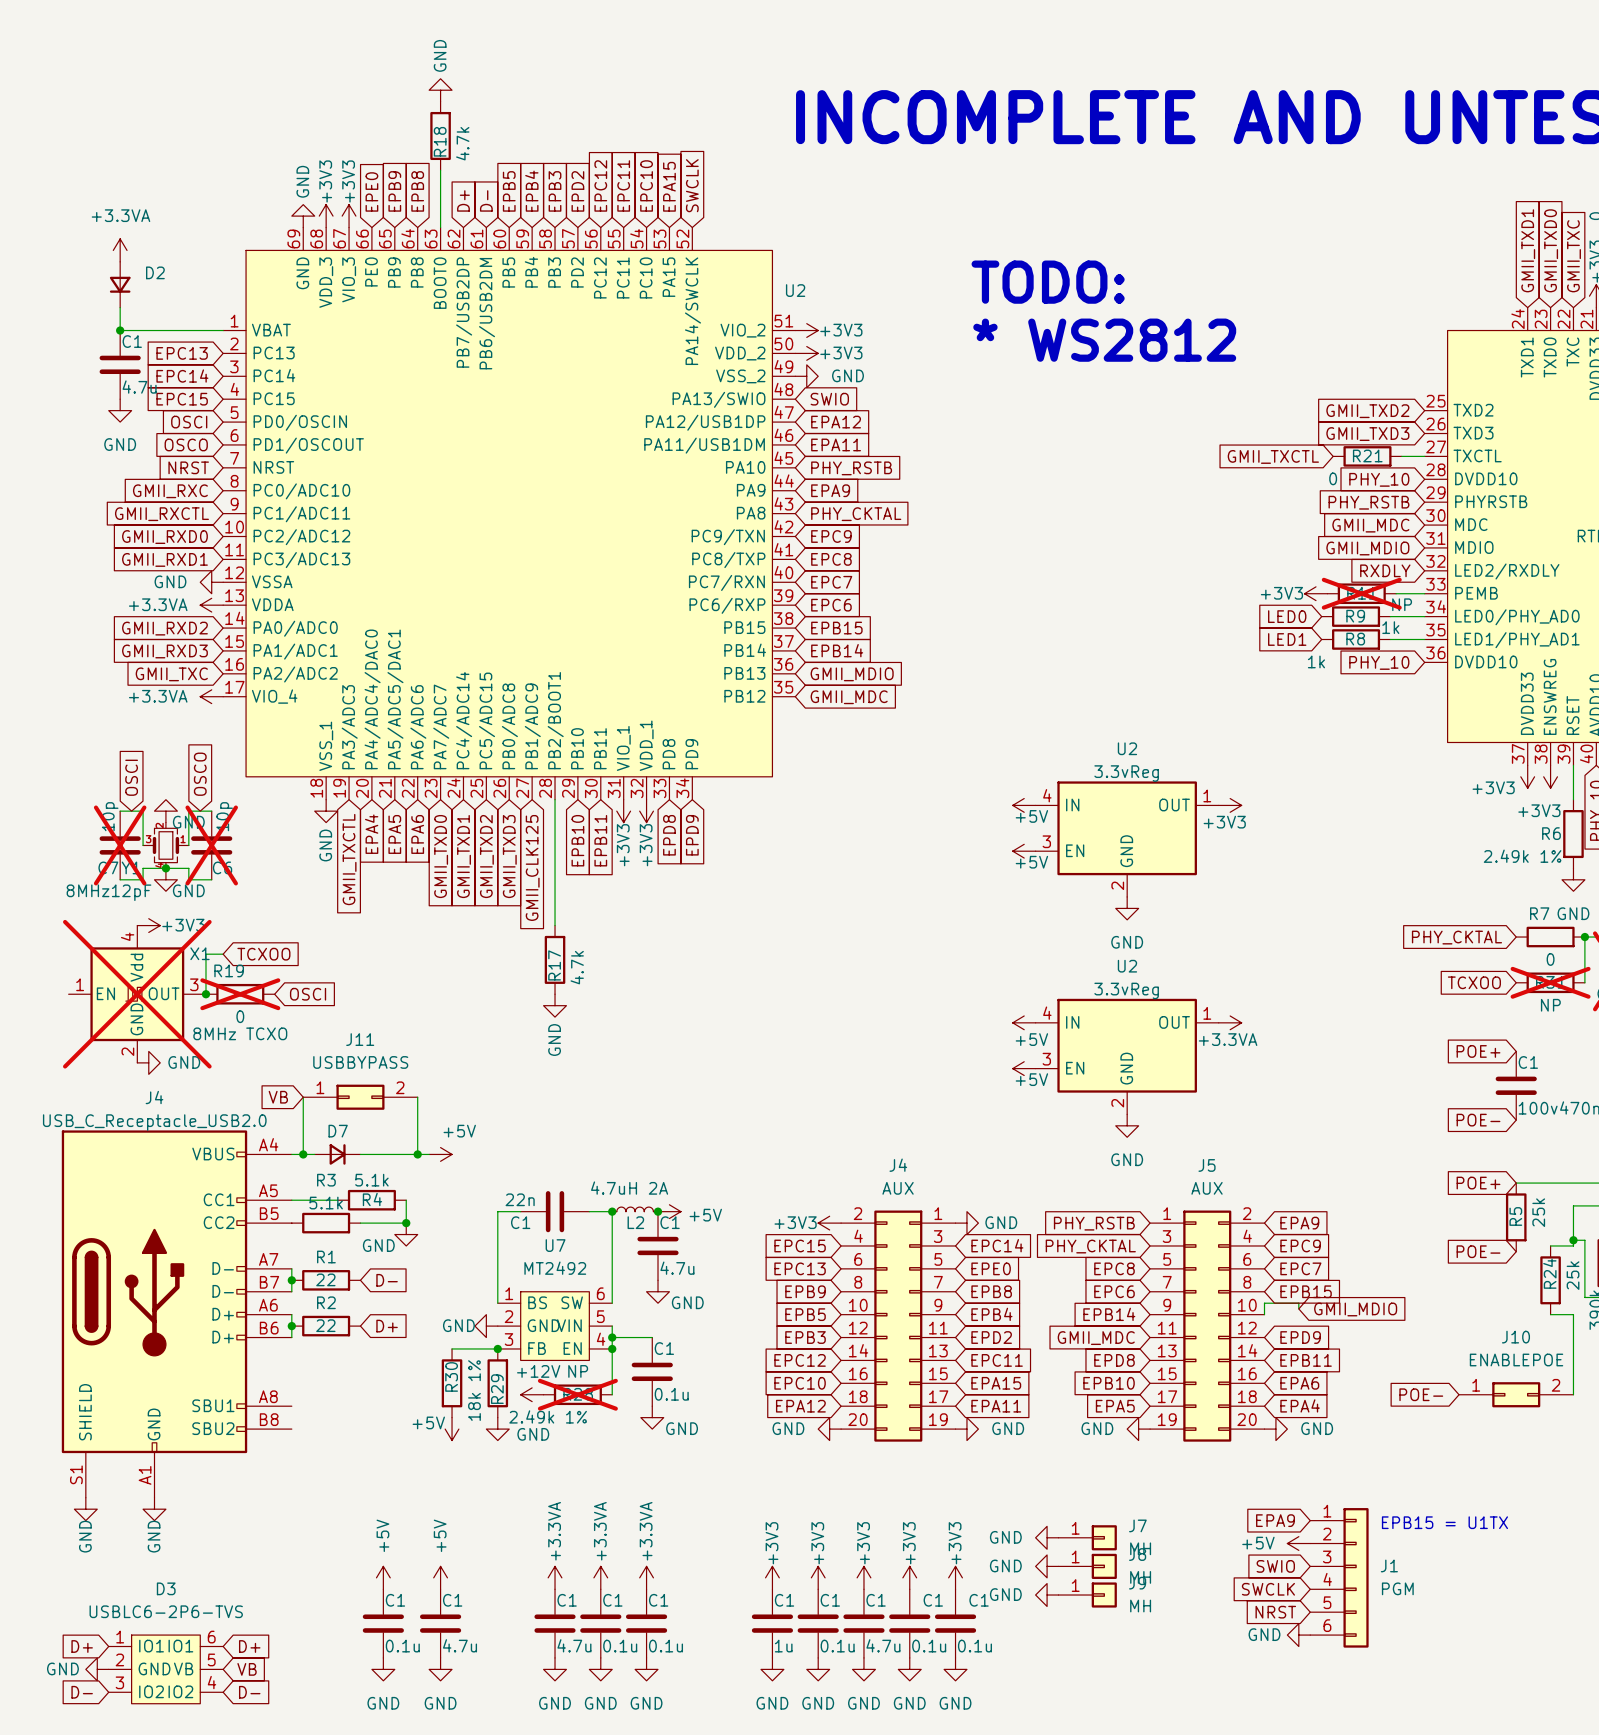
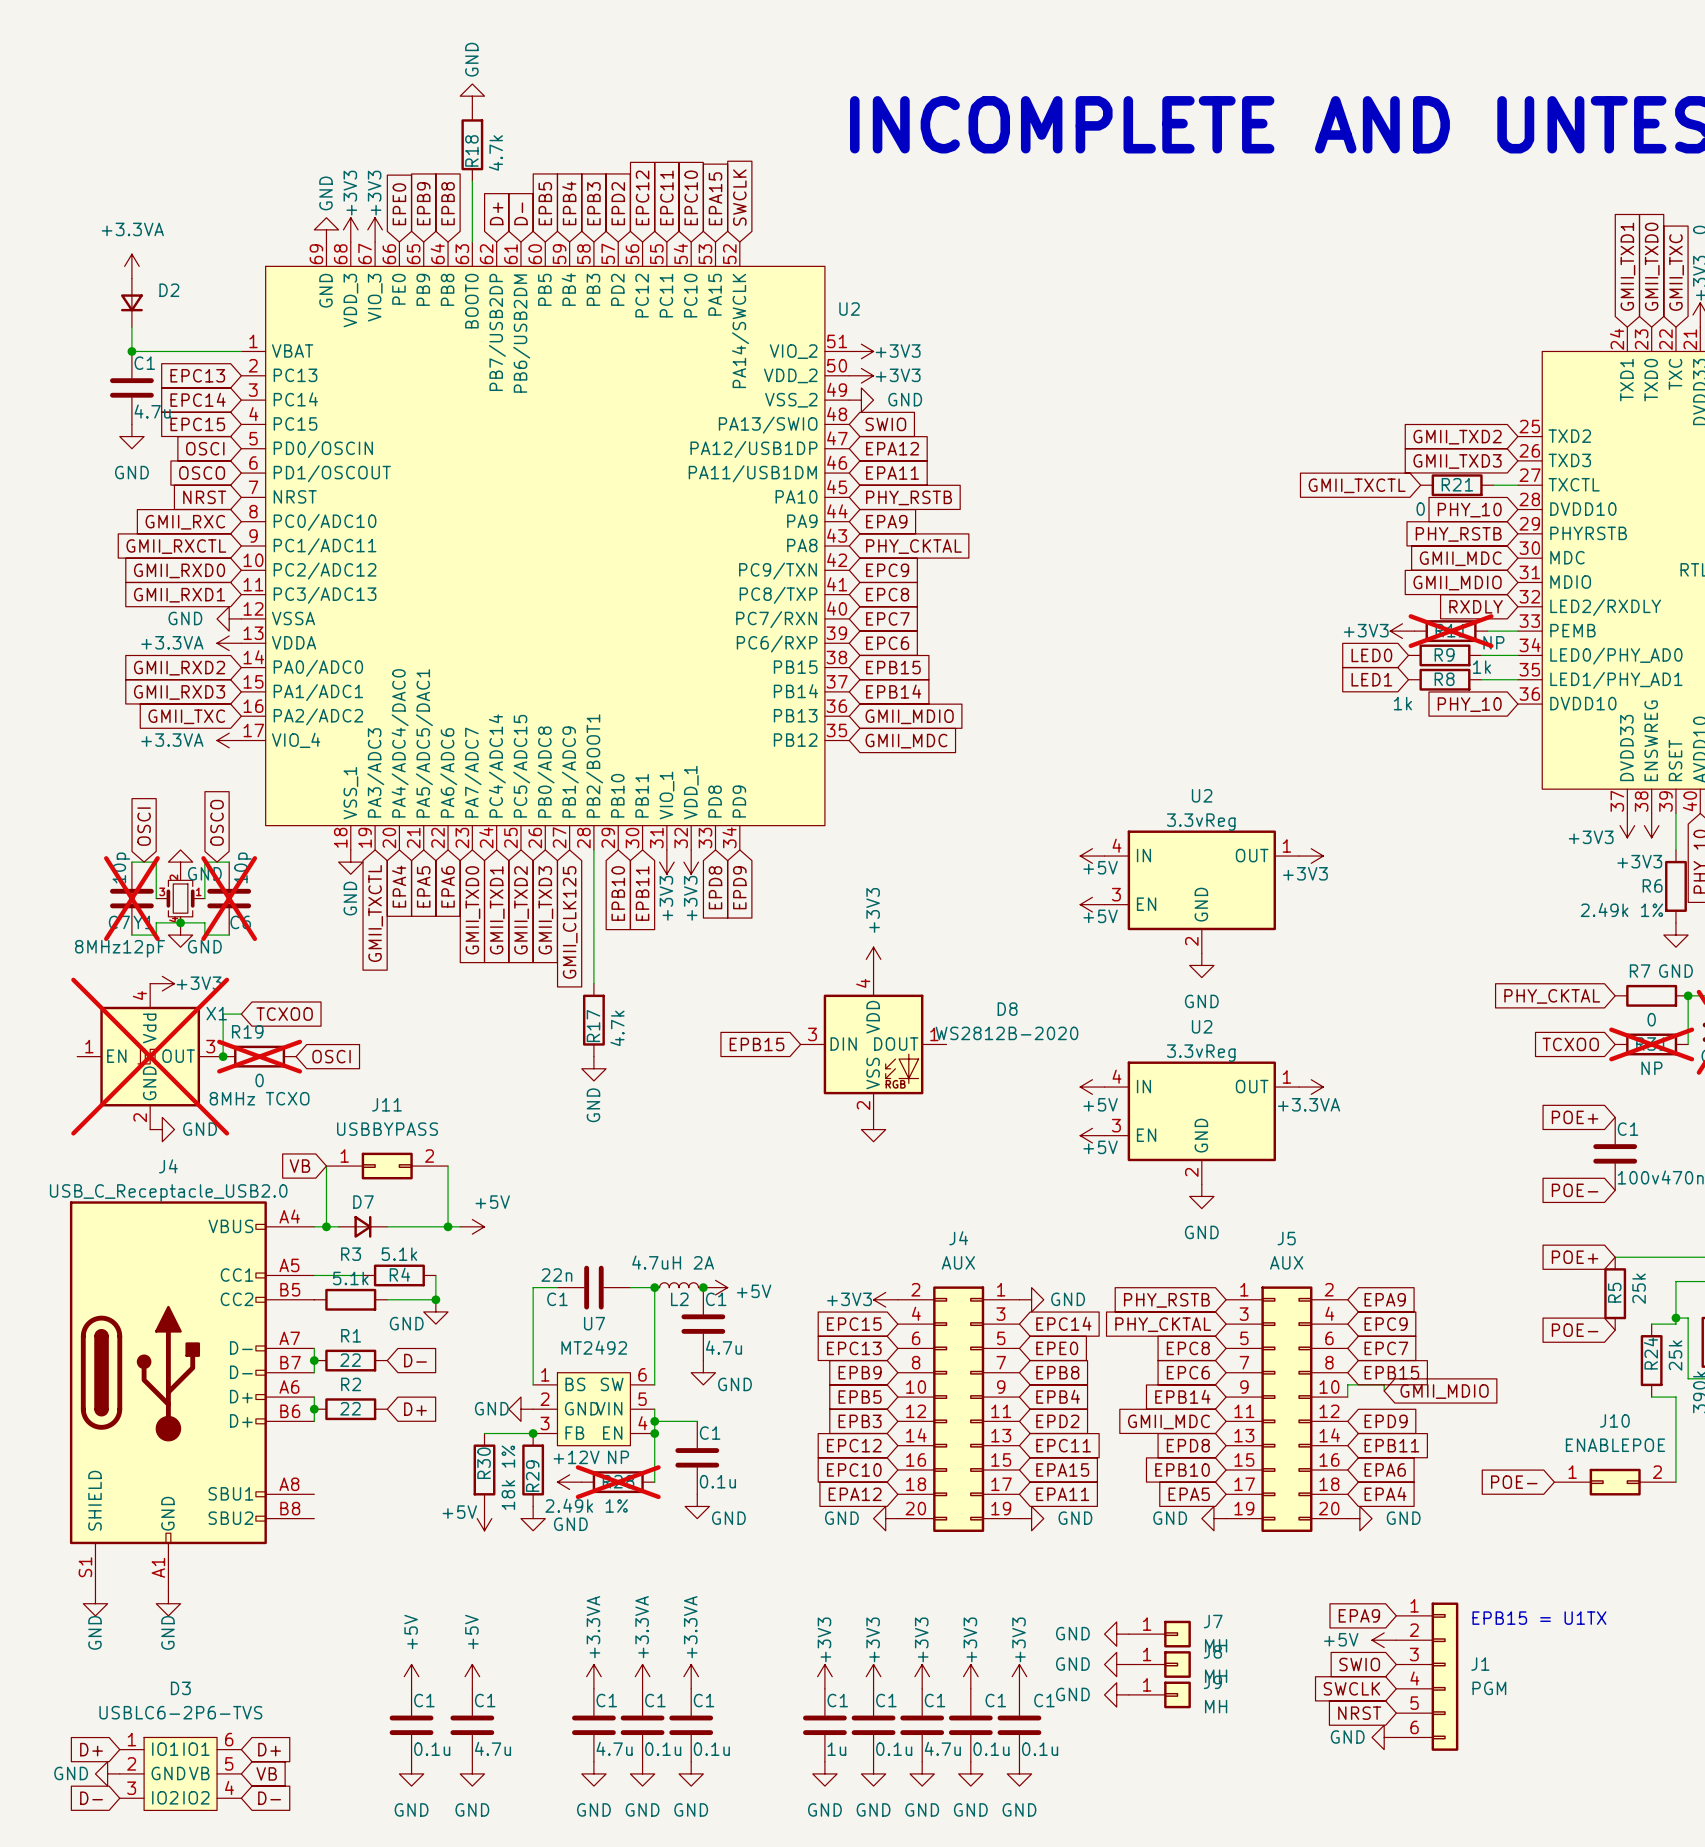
text: TODO: (1048, 282) -> none
text: * WS2812 (1104, 340) -> none
power symbol: none -> +3V3 (873, 959)
global label: none -> EPB15 (757, 1044)
D8: none -> WS2812B-2020 (873, 1044)
power symbol: none -> (873, 1129)

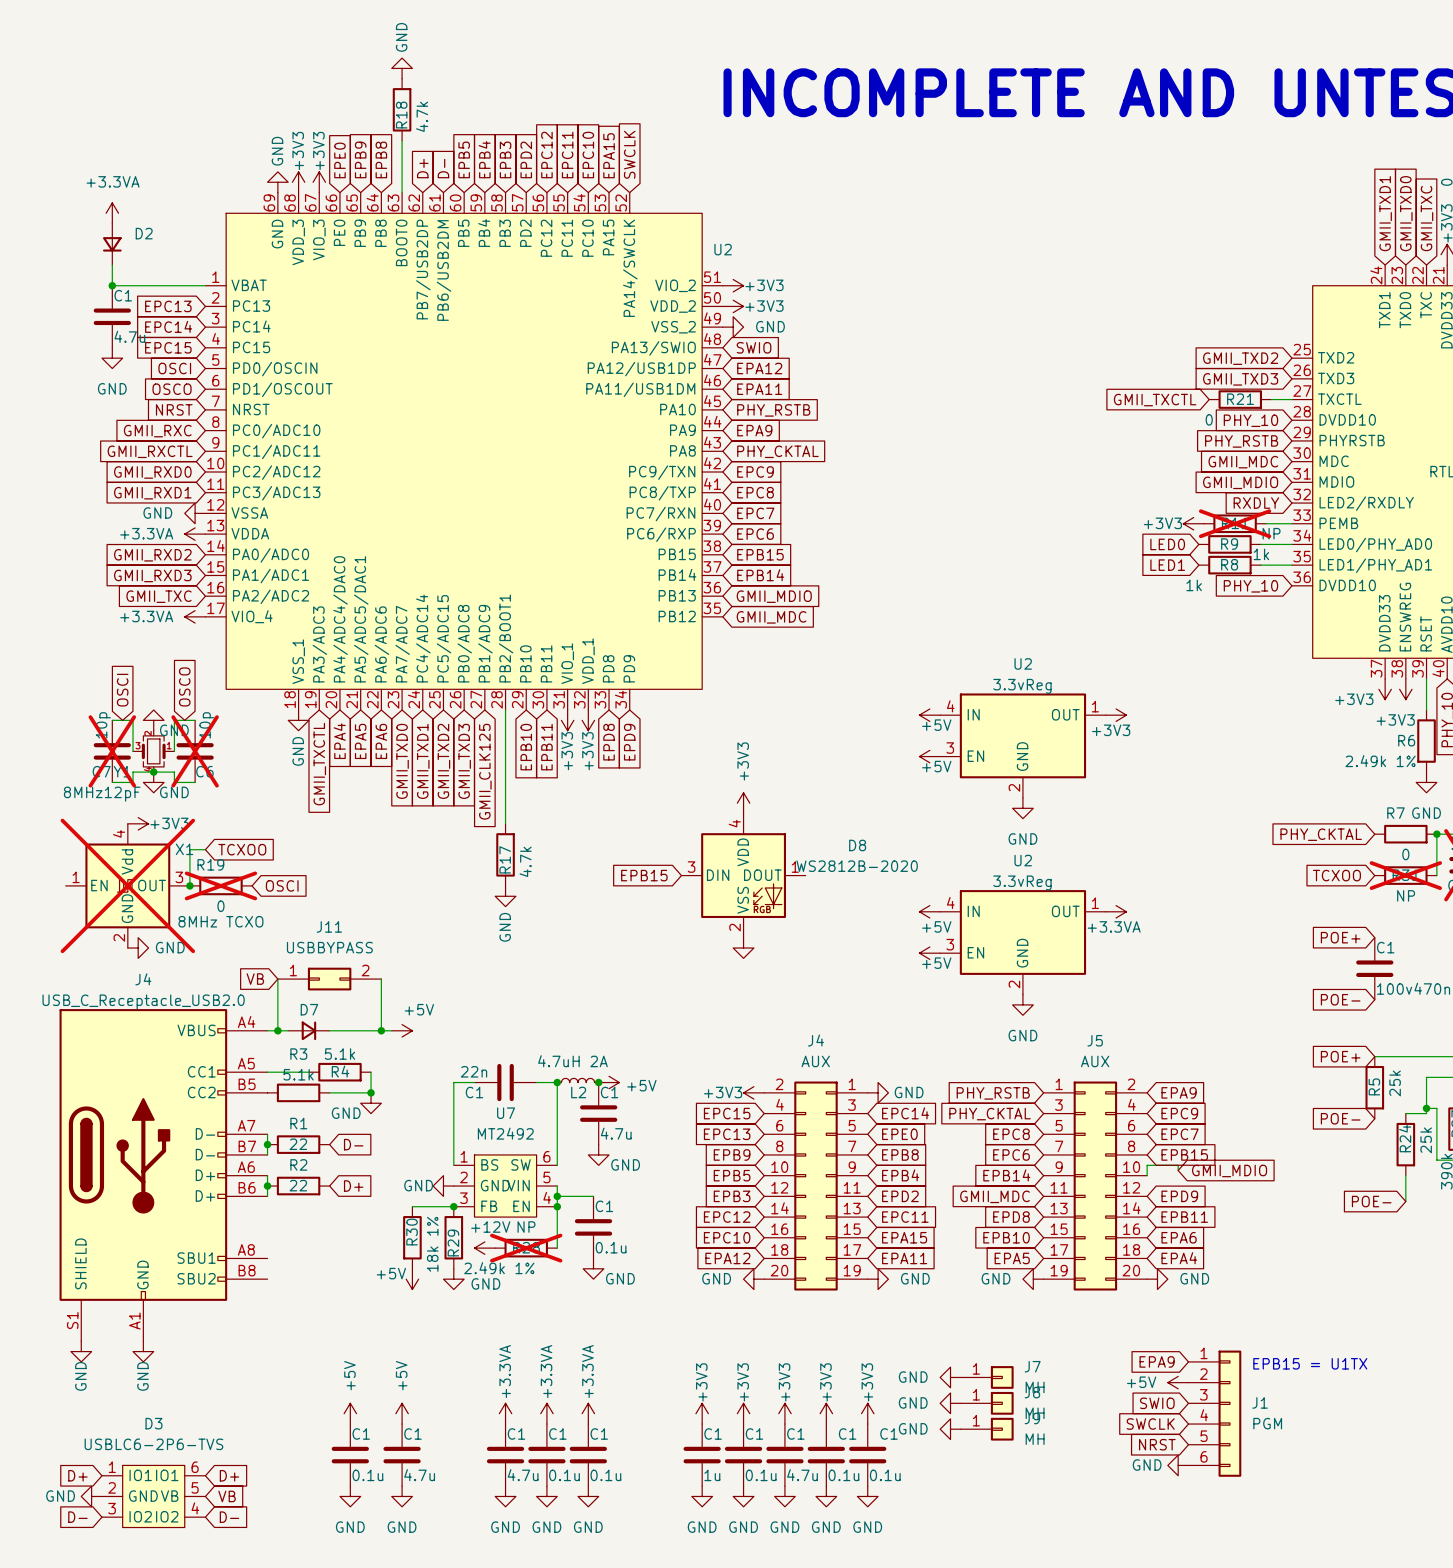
wire: (1651, 1397) (1675, 1397) (1675, 1482) -> (1405, 1175) (1405, 1201)
global label position: POE- (1514, 1482) -> POE- (1371, 1201)
J10: ENABLEPOE (1615, 1482) -> none

